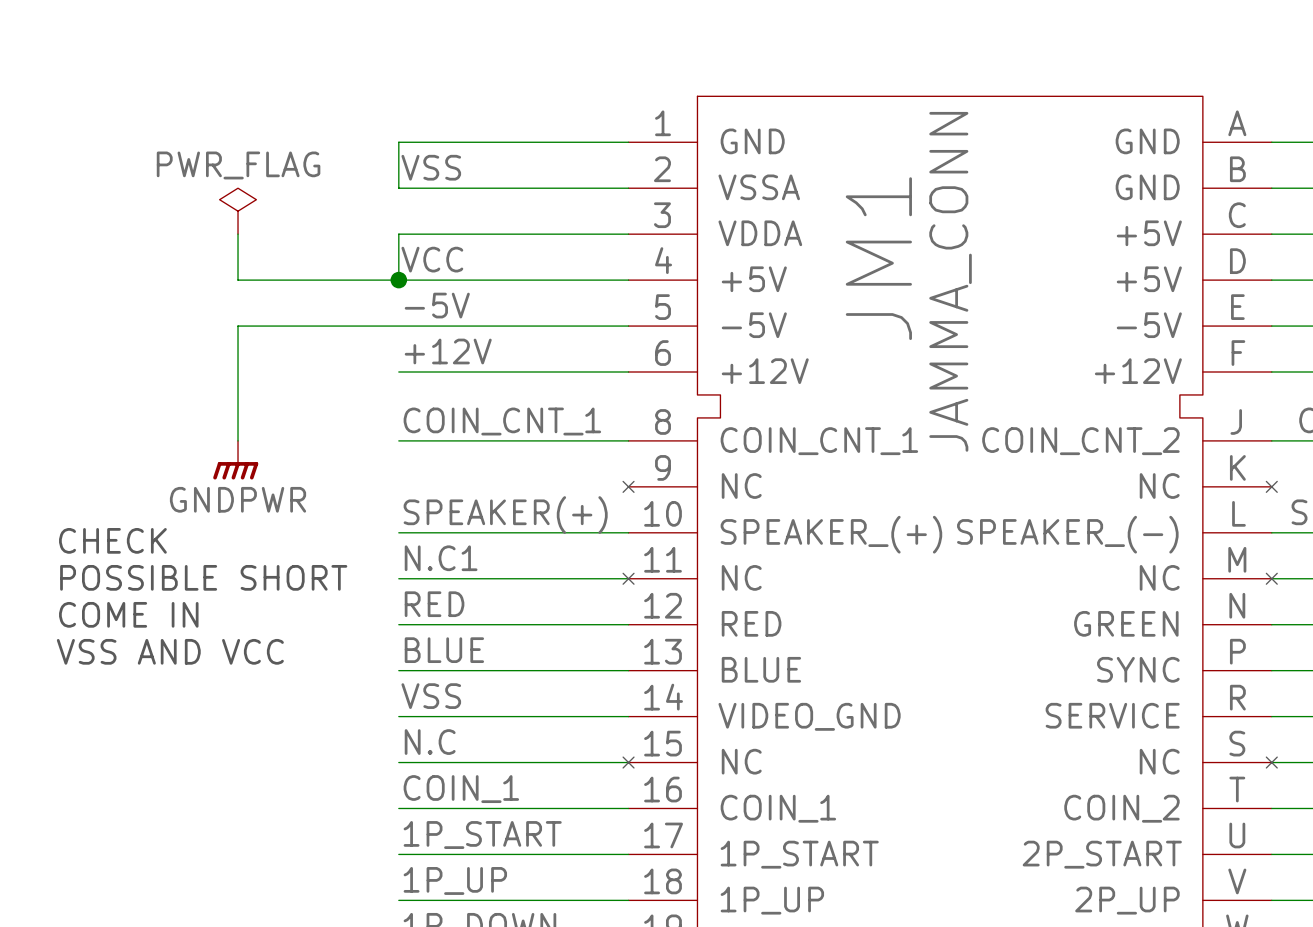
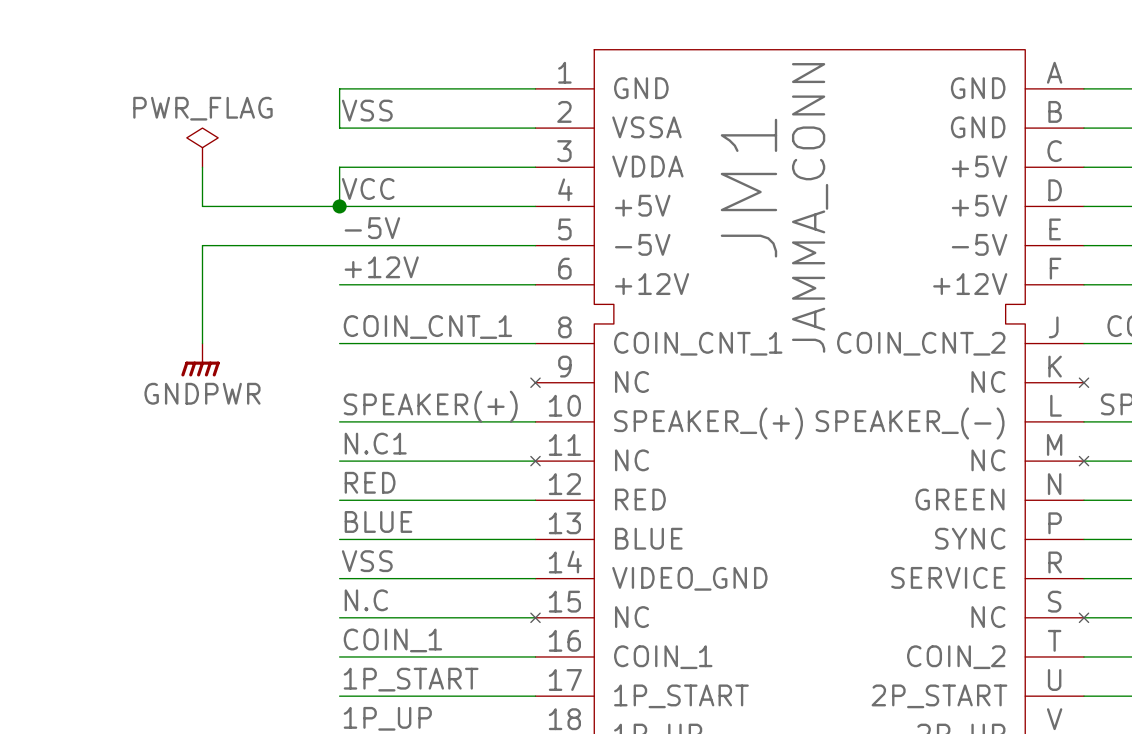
text: CHECK (112, 540) -> none
text: POSSIBLE SHORT (203, 577) -> none
text: COME IN (128, 614) -> none
text: VSS AND VCC (170, 651) -> none

